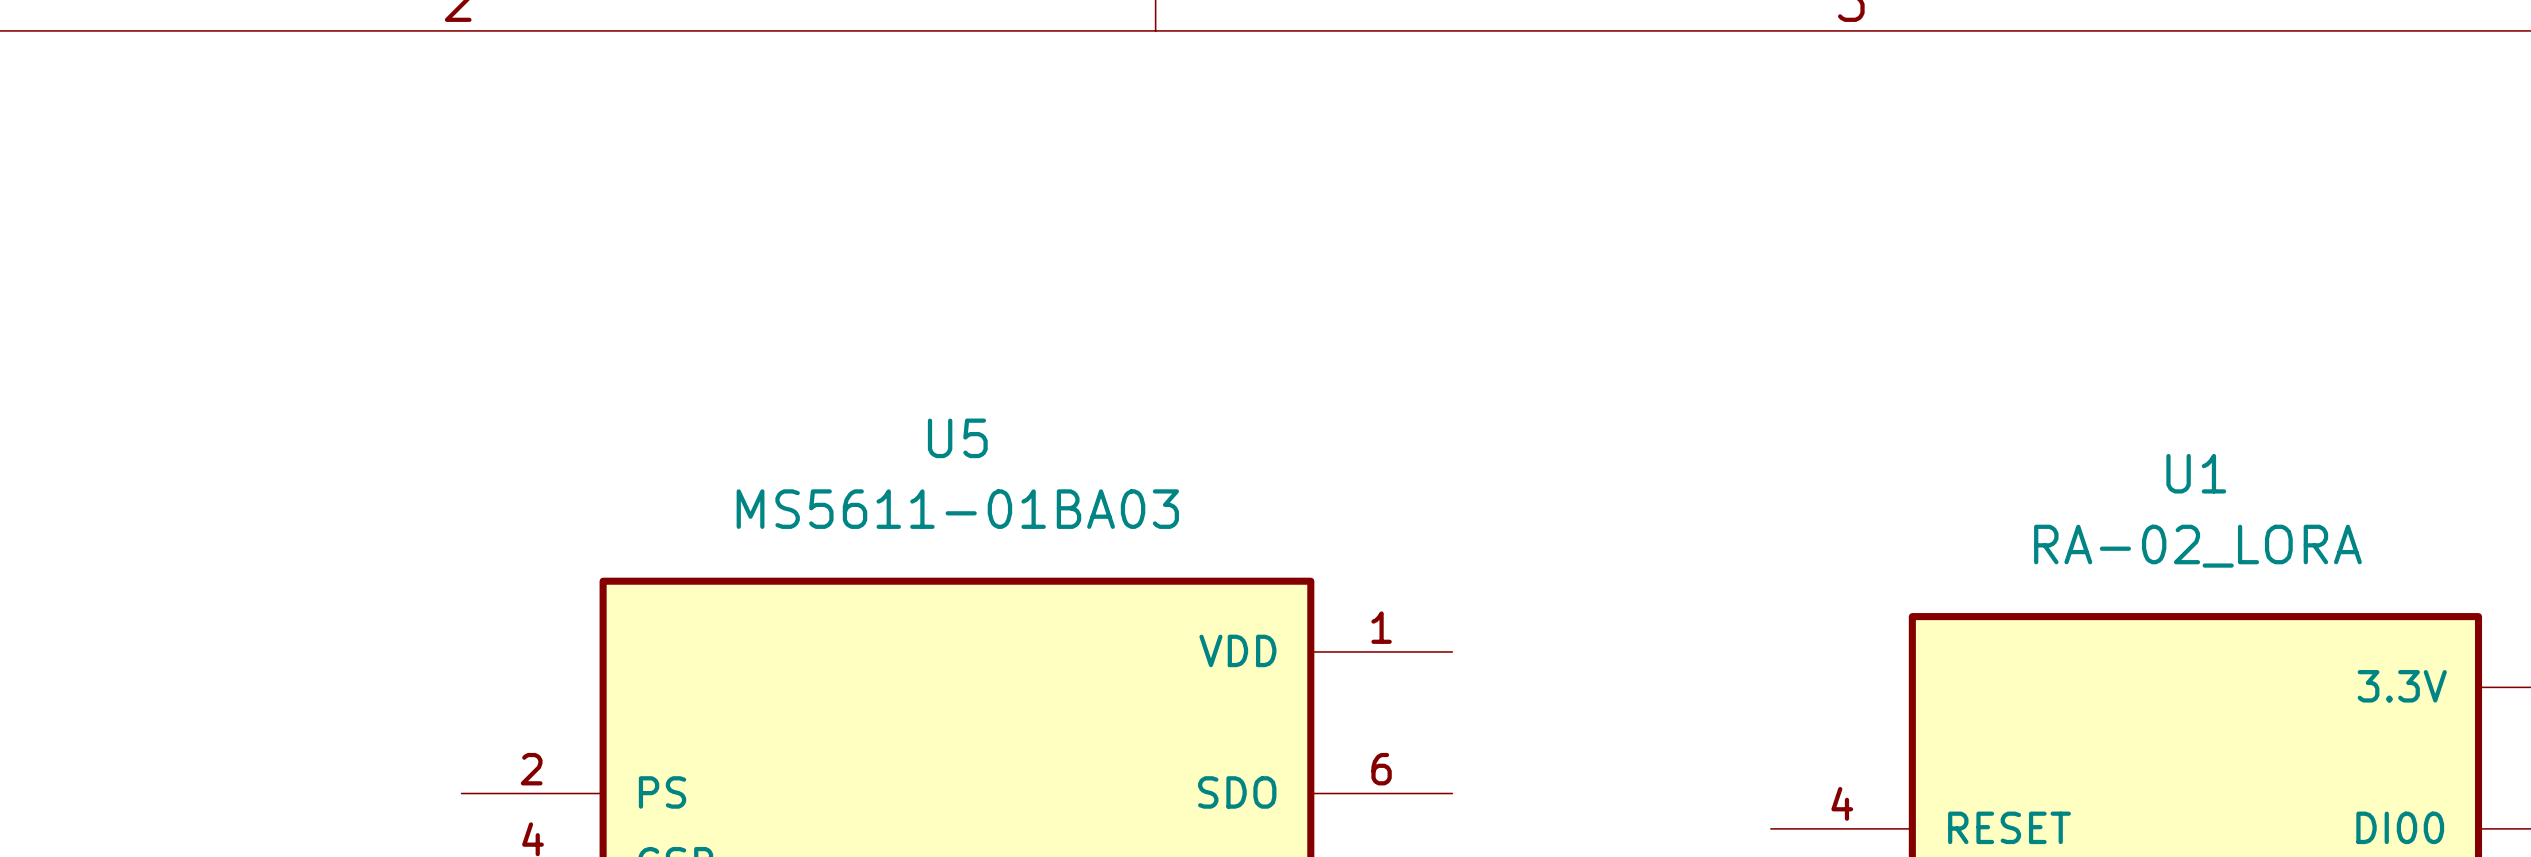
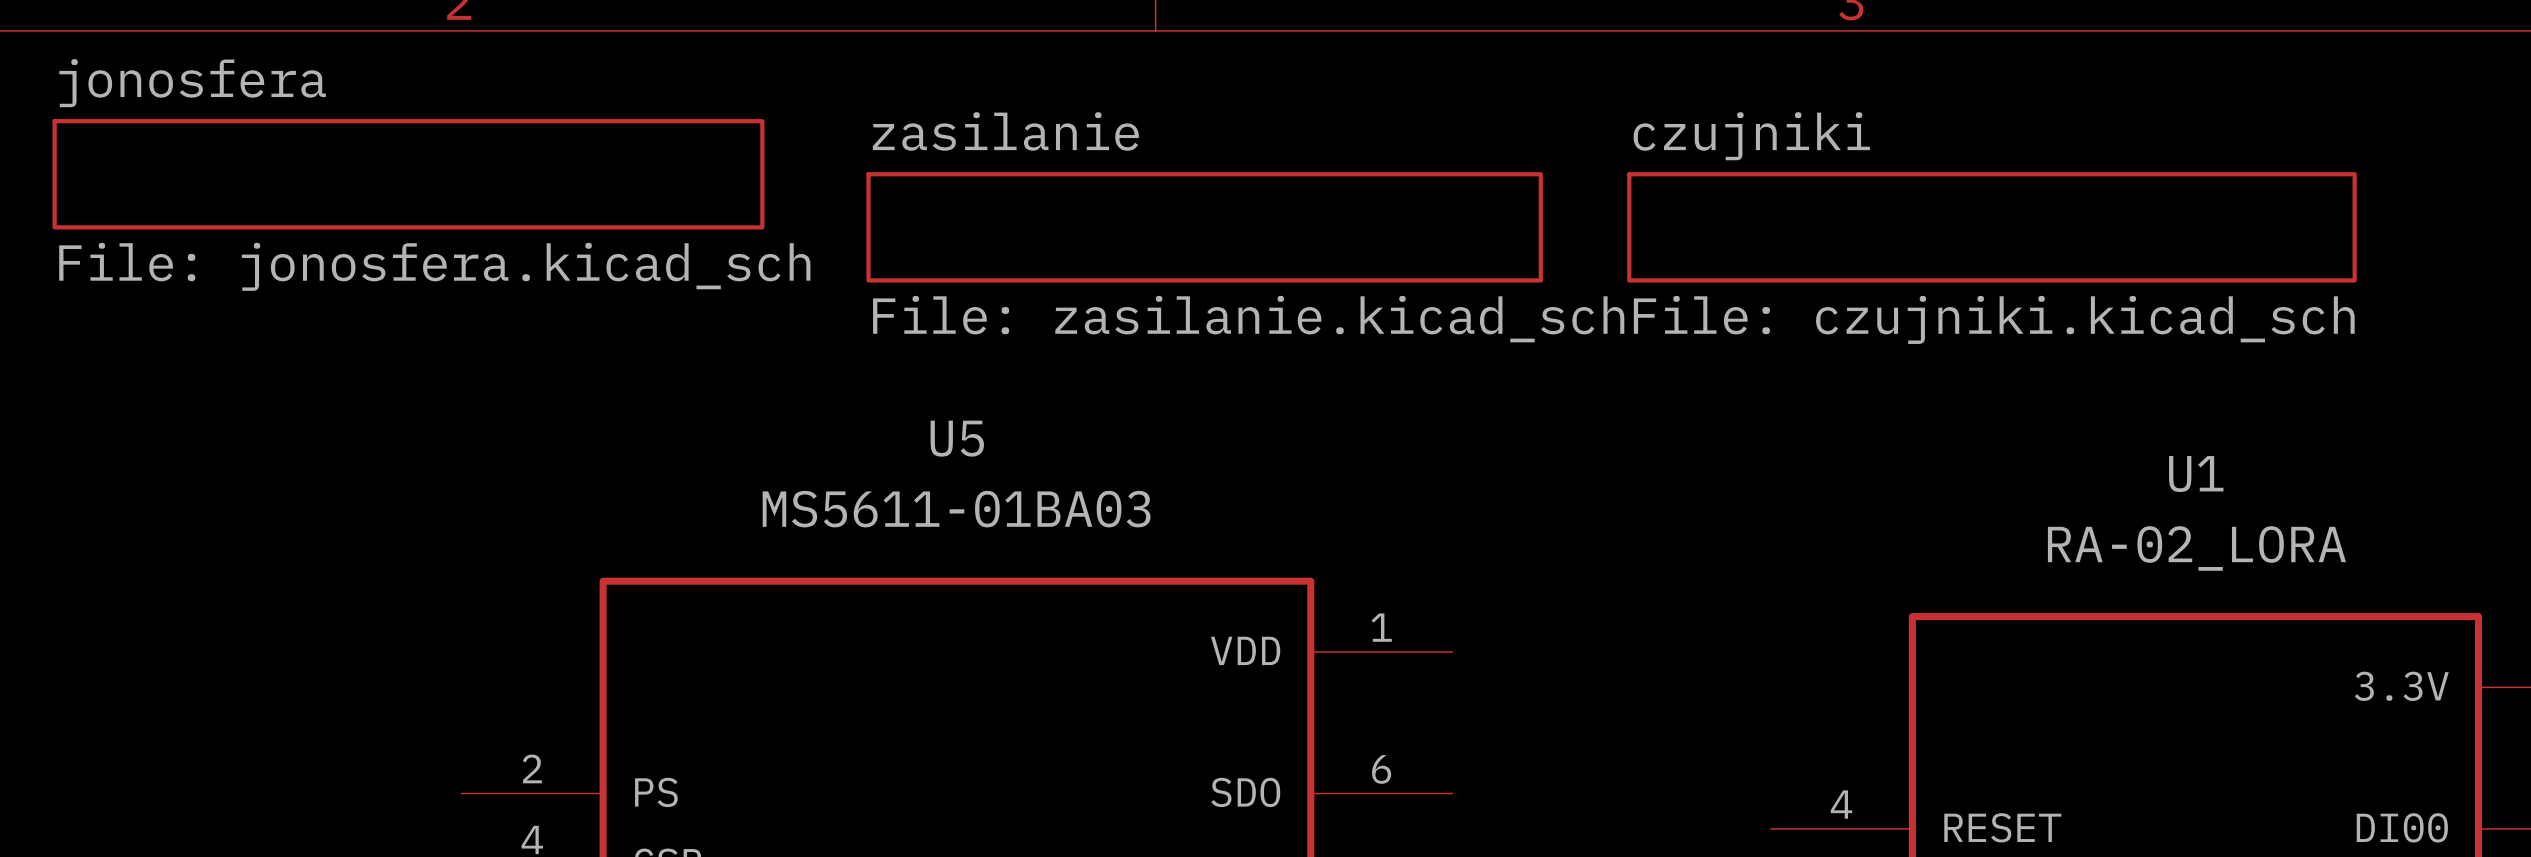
sheet jonosfera: none -> File: jonosfera.kicad_sch (408, 174)
sheet zasilanie: none -> File: zasilanie.kicad_sch (1204, 227)
sheet czujniki: none -> File: czujniki.kicad_sch (1991, 227)

